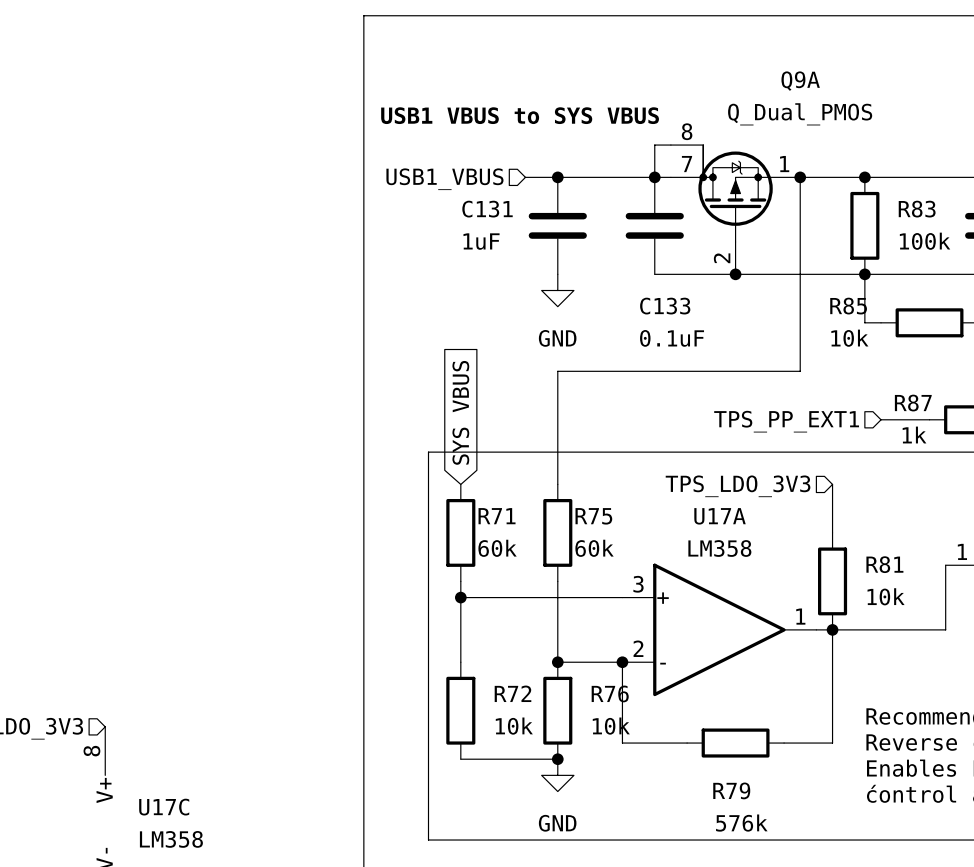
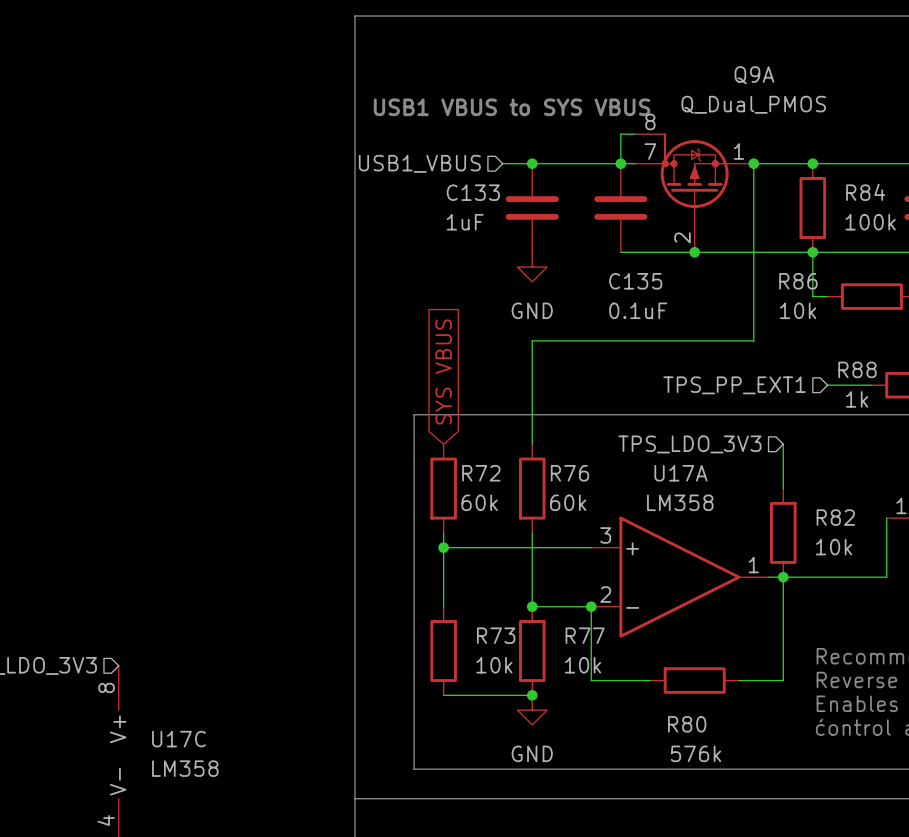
C131 name: C131 (487, 209) -> C133 (473, 192)
R83 name: R83 (917, 209) -> R84 (865, 192)
C133 name: C133 (665, 306) -> C135 (635, 281)
R85 name: R85 (848, 306) -> R86 (798, 281)
R87 name: R87 (913, 403) -> R88 (857, 369)
R71 name: R71 (497, 516) -> R72 (481, 473)
R75 name: R75 (593, 516) -> R76 (569, 473)
R81 name: R81 (884, 564) -> R82 (835, 517)
R72 name: R72 (513, 693) -> R73 (496, 635)
R76 name: R76 (610, 693) -> R77 (585, 635)
R79 name: R79 (731, 790) -> R80 (687, 724)

